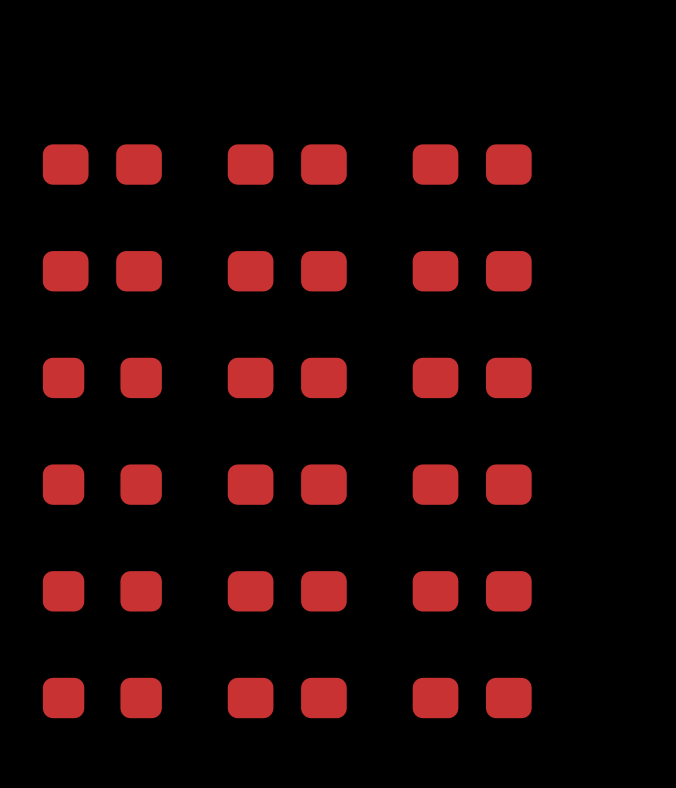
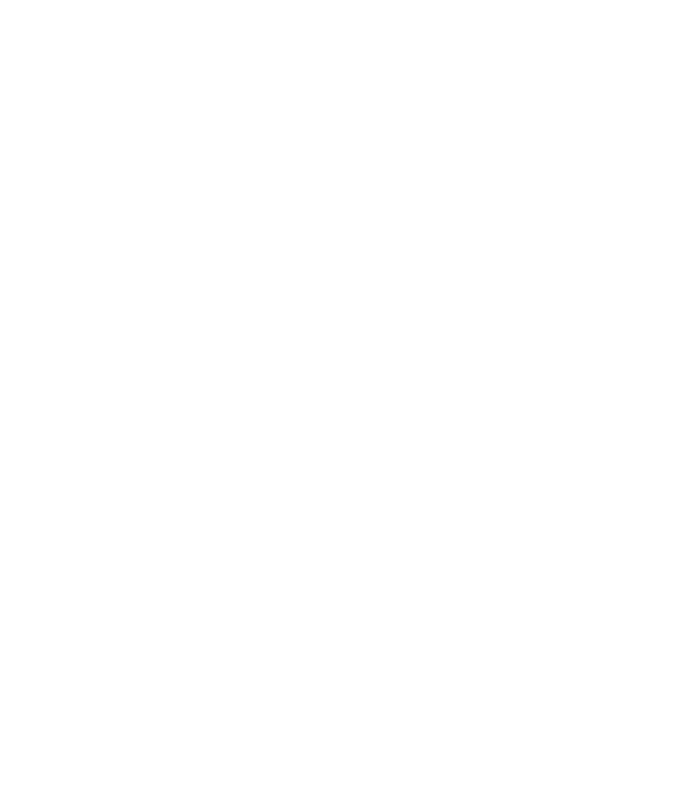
part: (102, 164) -> none
part: (287, 164) -> none
part: (472, 164) -> none
part: (102, 271) -> none
part: (287, 271) -> none
part: (472, 271) -> none
part: (102, 377) -> none
part: (287, 377) -> none
part: (472, 377) -> none
part: (102, 484) -> none
part: (287, 484) -> none
part: (472, 484) -> none
part: (102, 591) -> none
part: (287, 591) -> none
part: (472, 591) -> none
part: (102, 698) -> none
part: (287, 698) -> none
part: (472, 698) -> none

